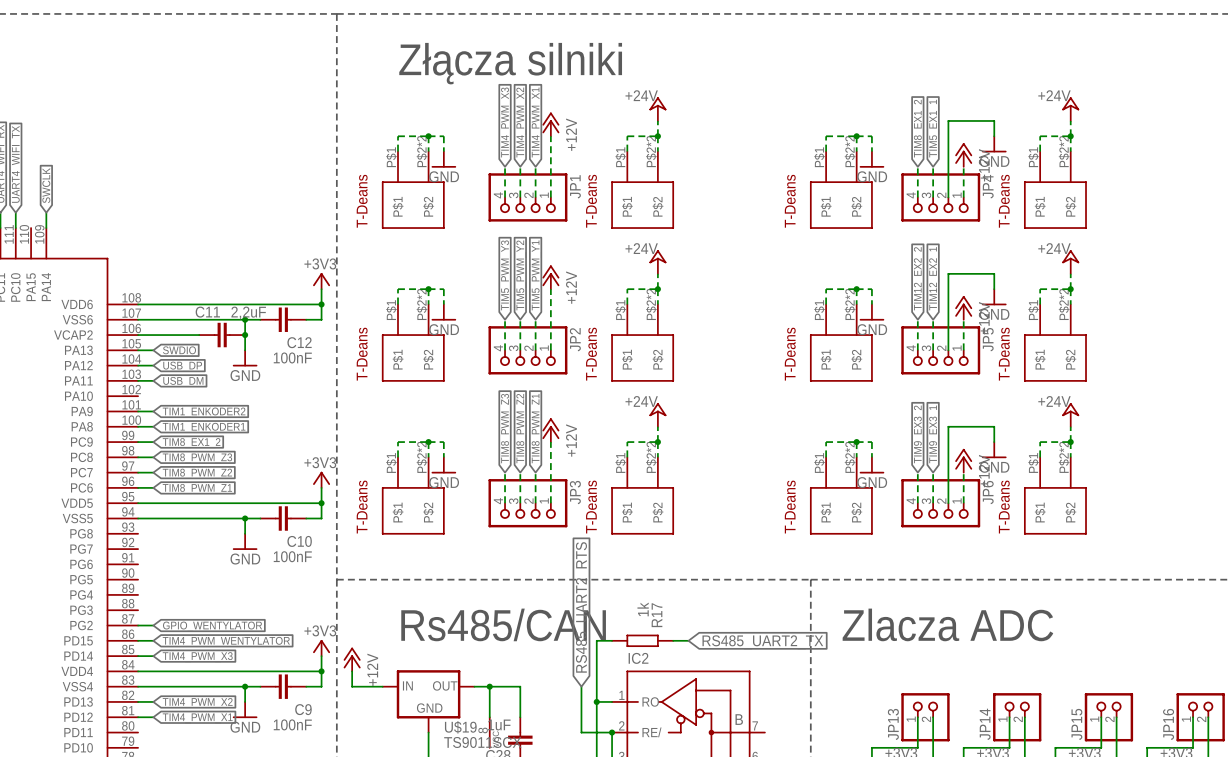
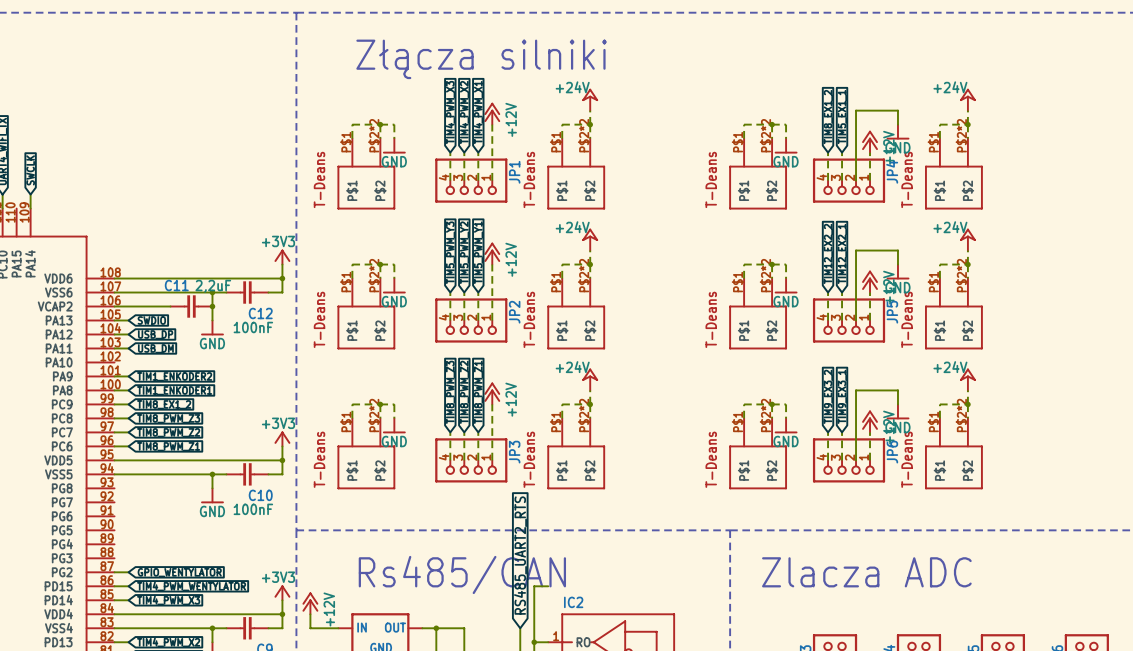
R17: 1k (642, 640) -> none
wire: (673, 640) (688, 640) -> none
global label: RS485_UART2_TX (762, 642) -> none

